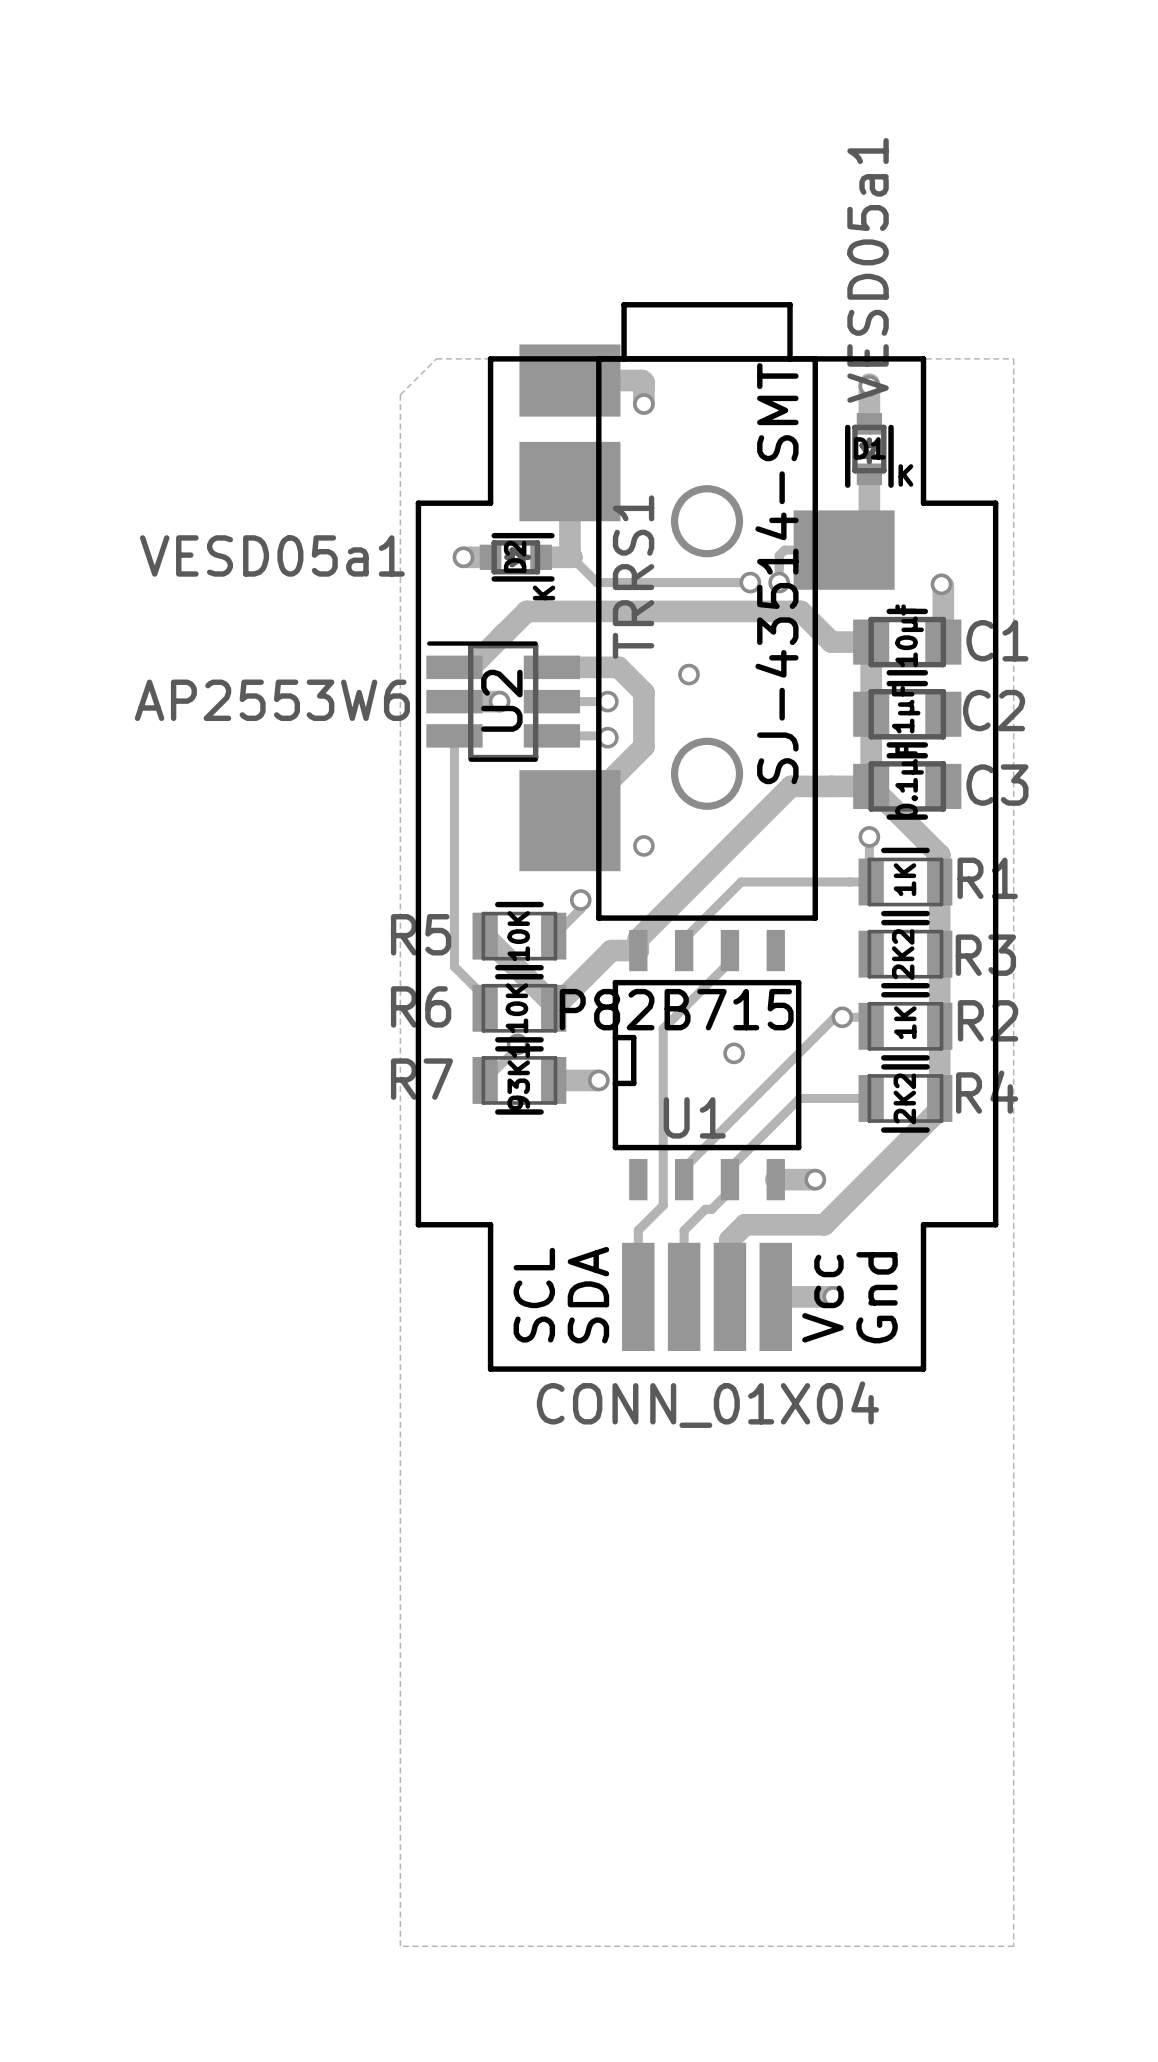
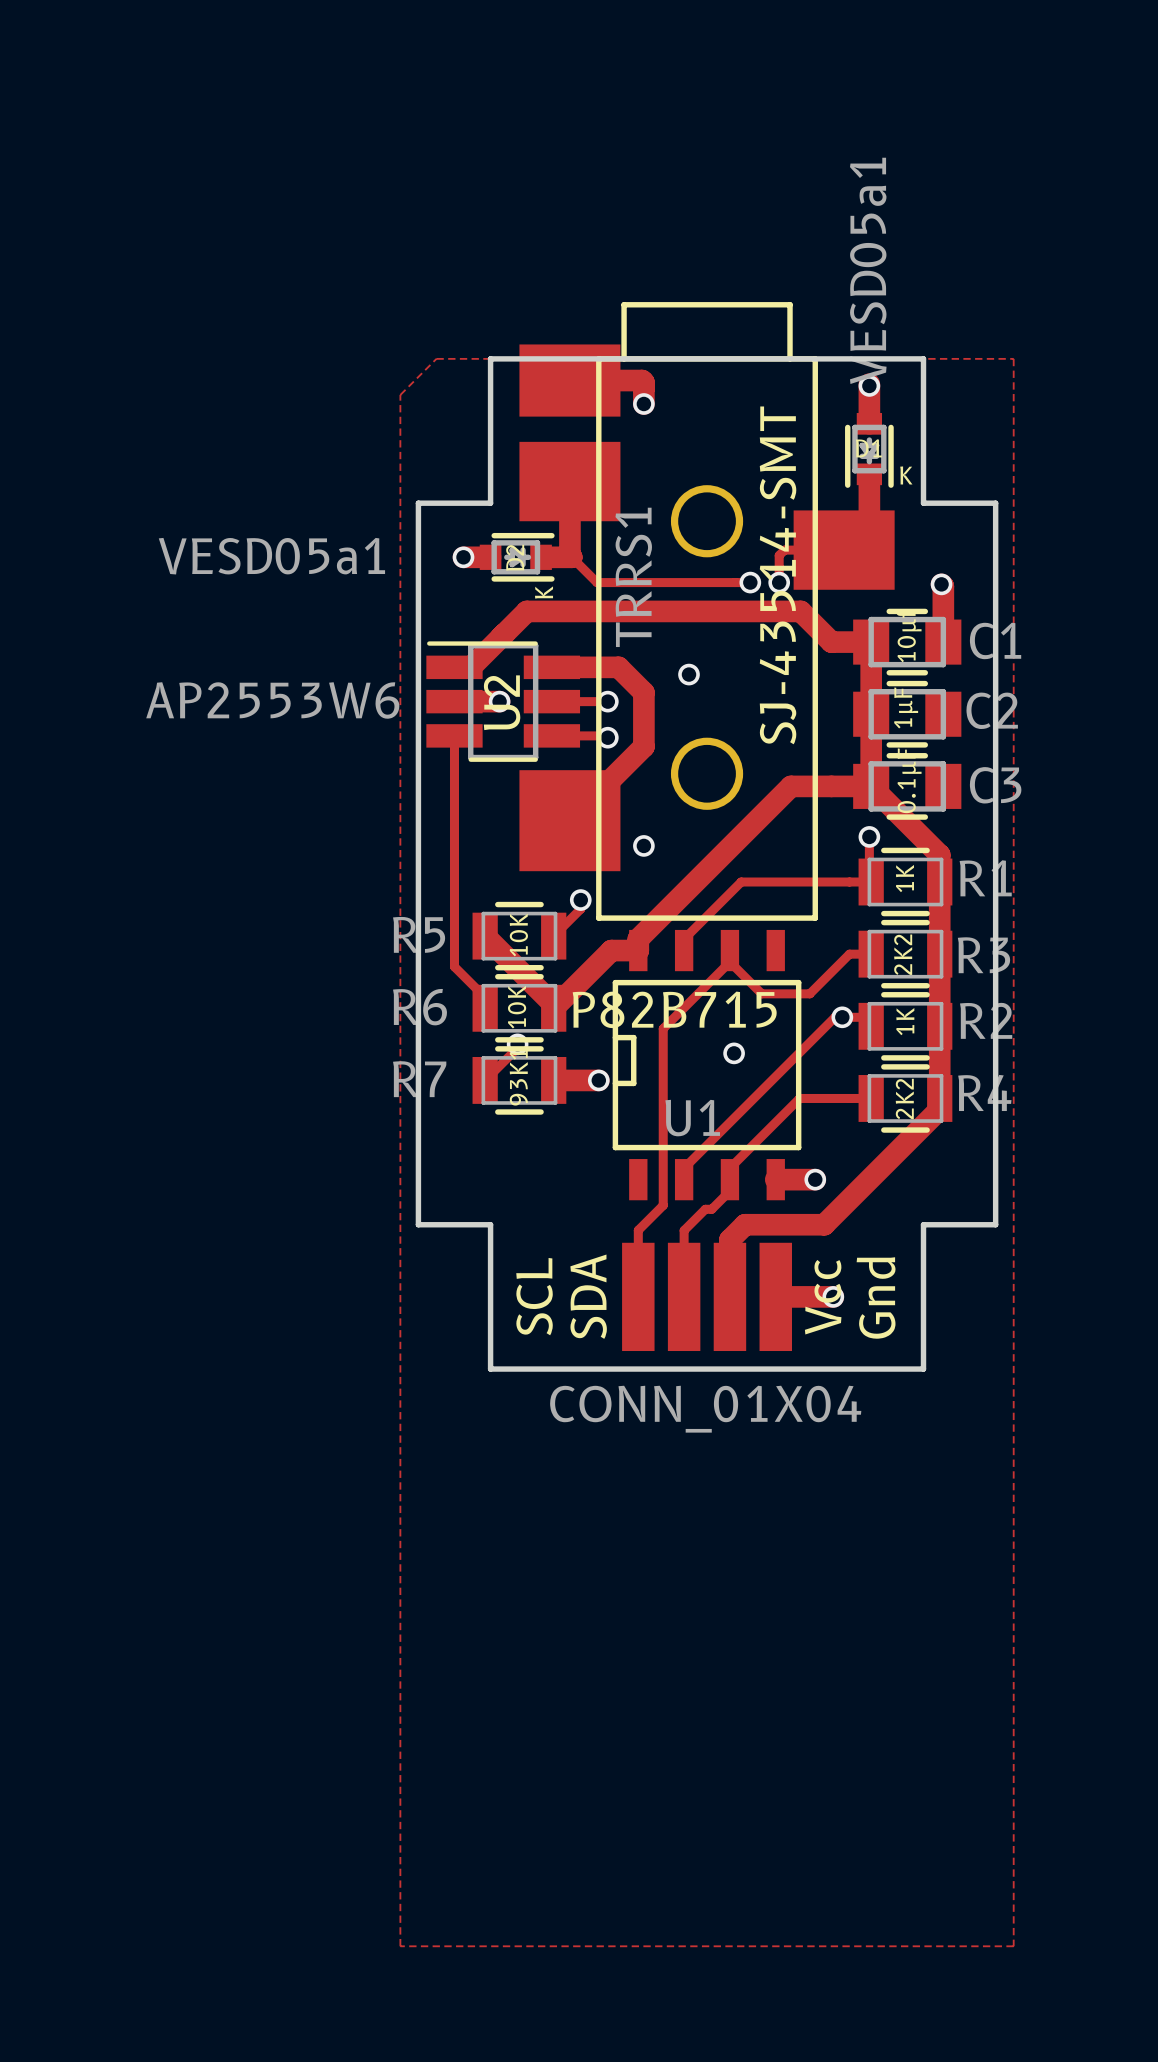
track: none -> (871, 954) (849, 954) (809, 993) (761, 993) (729, 962)

